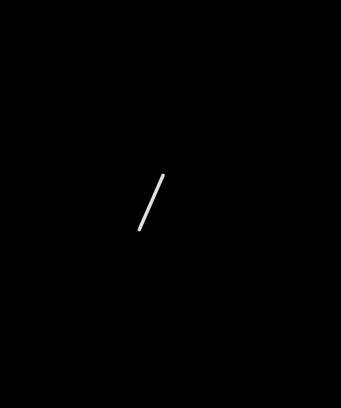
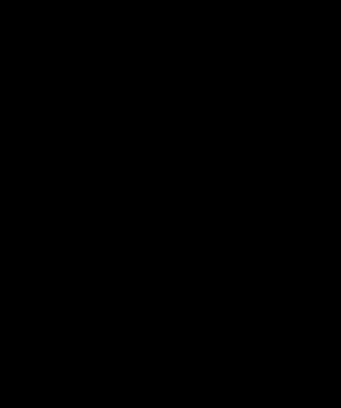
line: (163, 175) (139, 229) -> none

